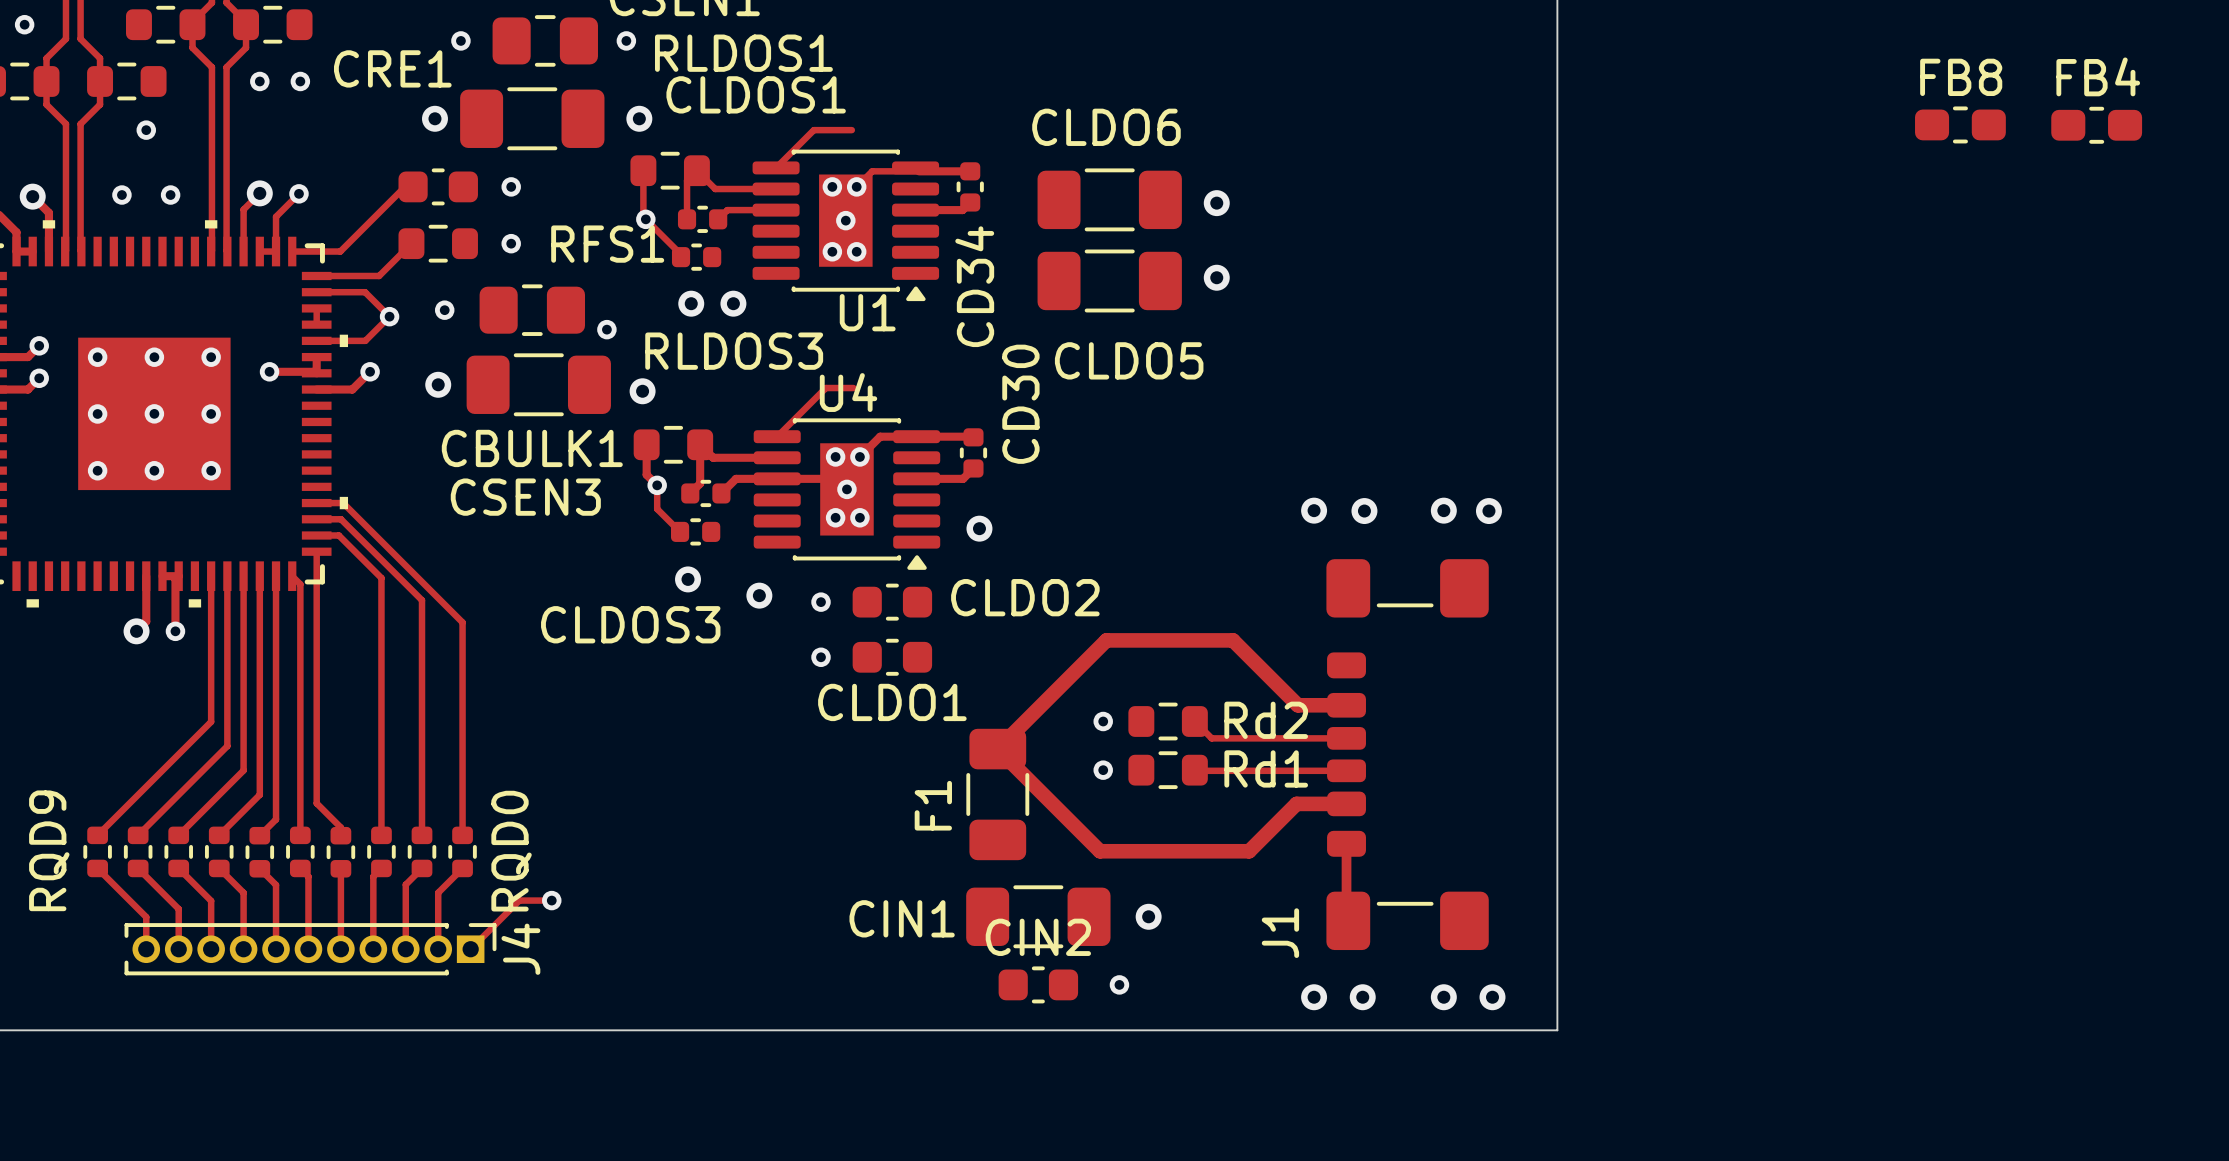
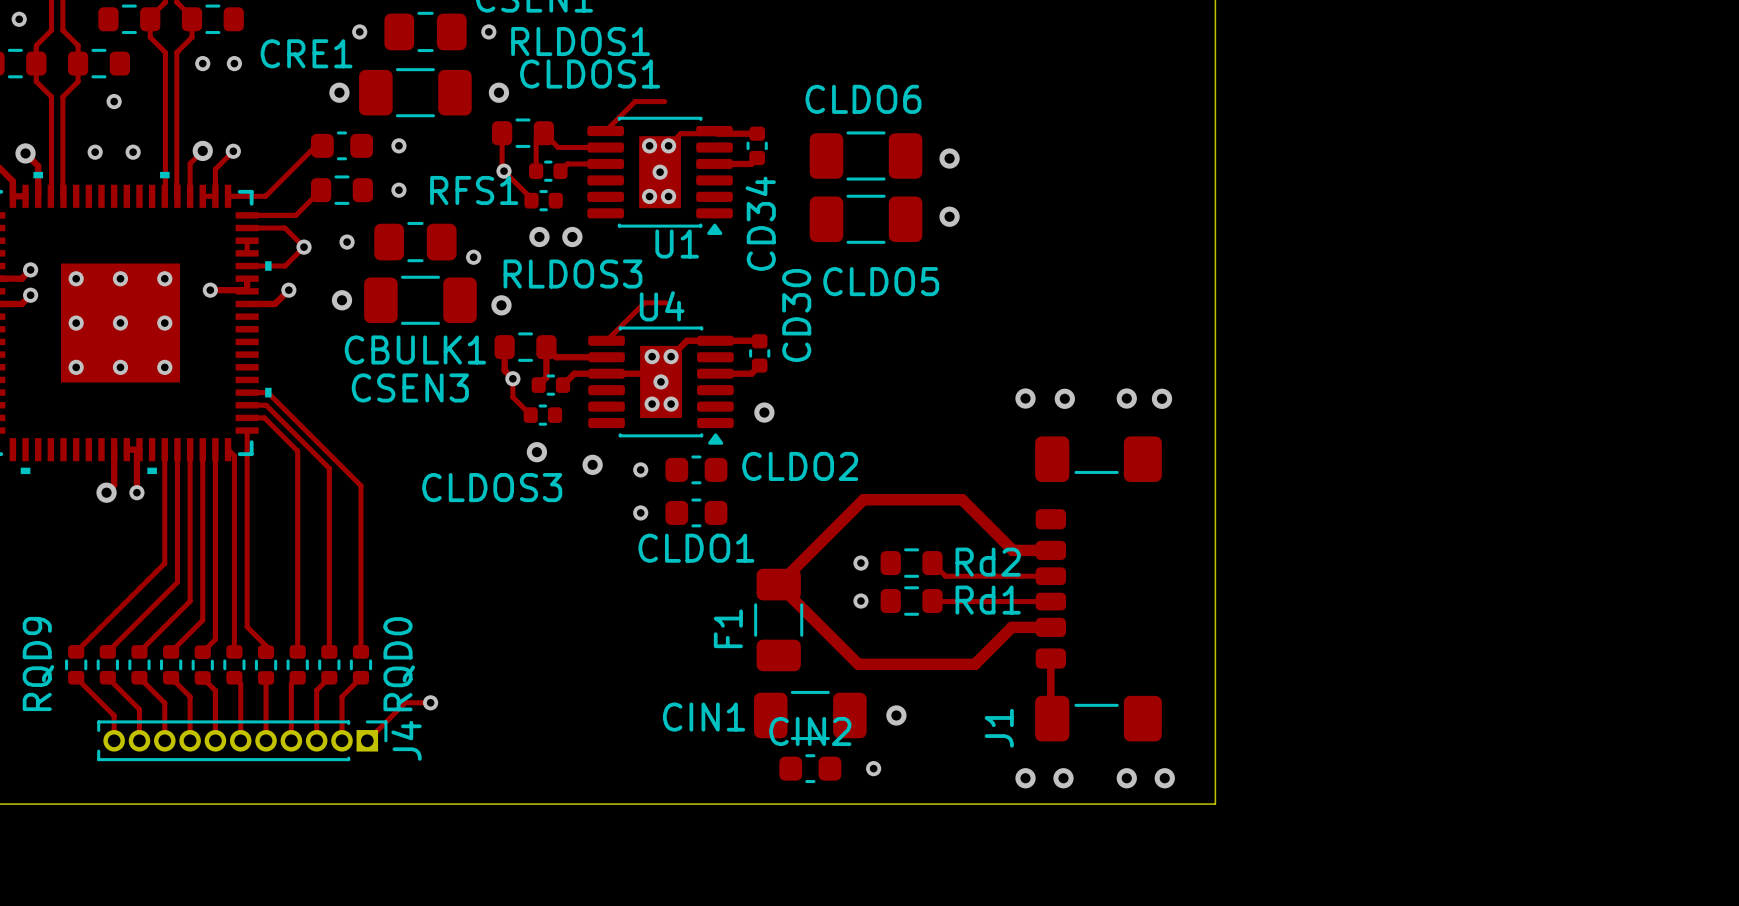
FB8: (1960, 124) -> none
FB4: (2096, 125) -> none

